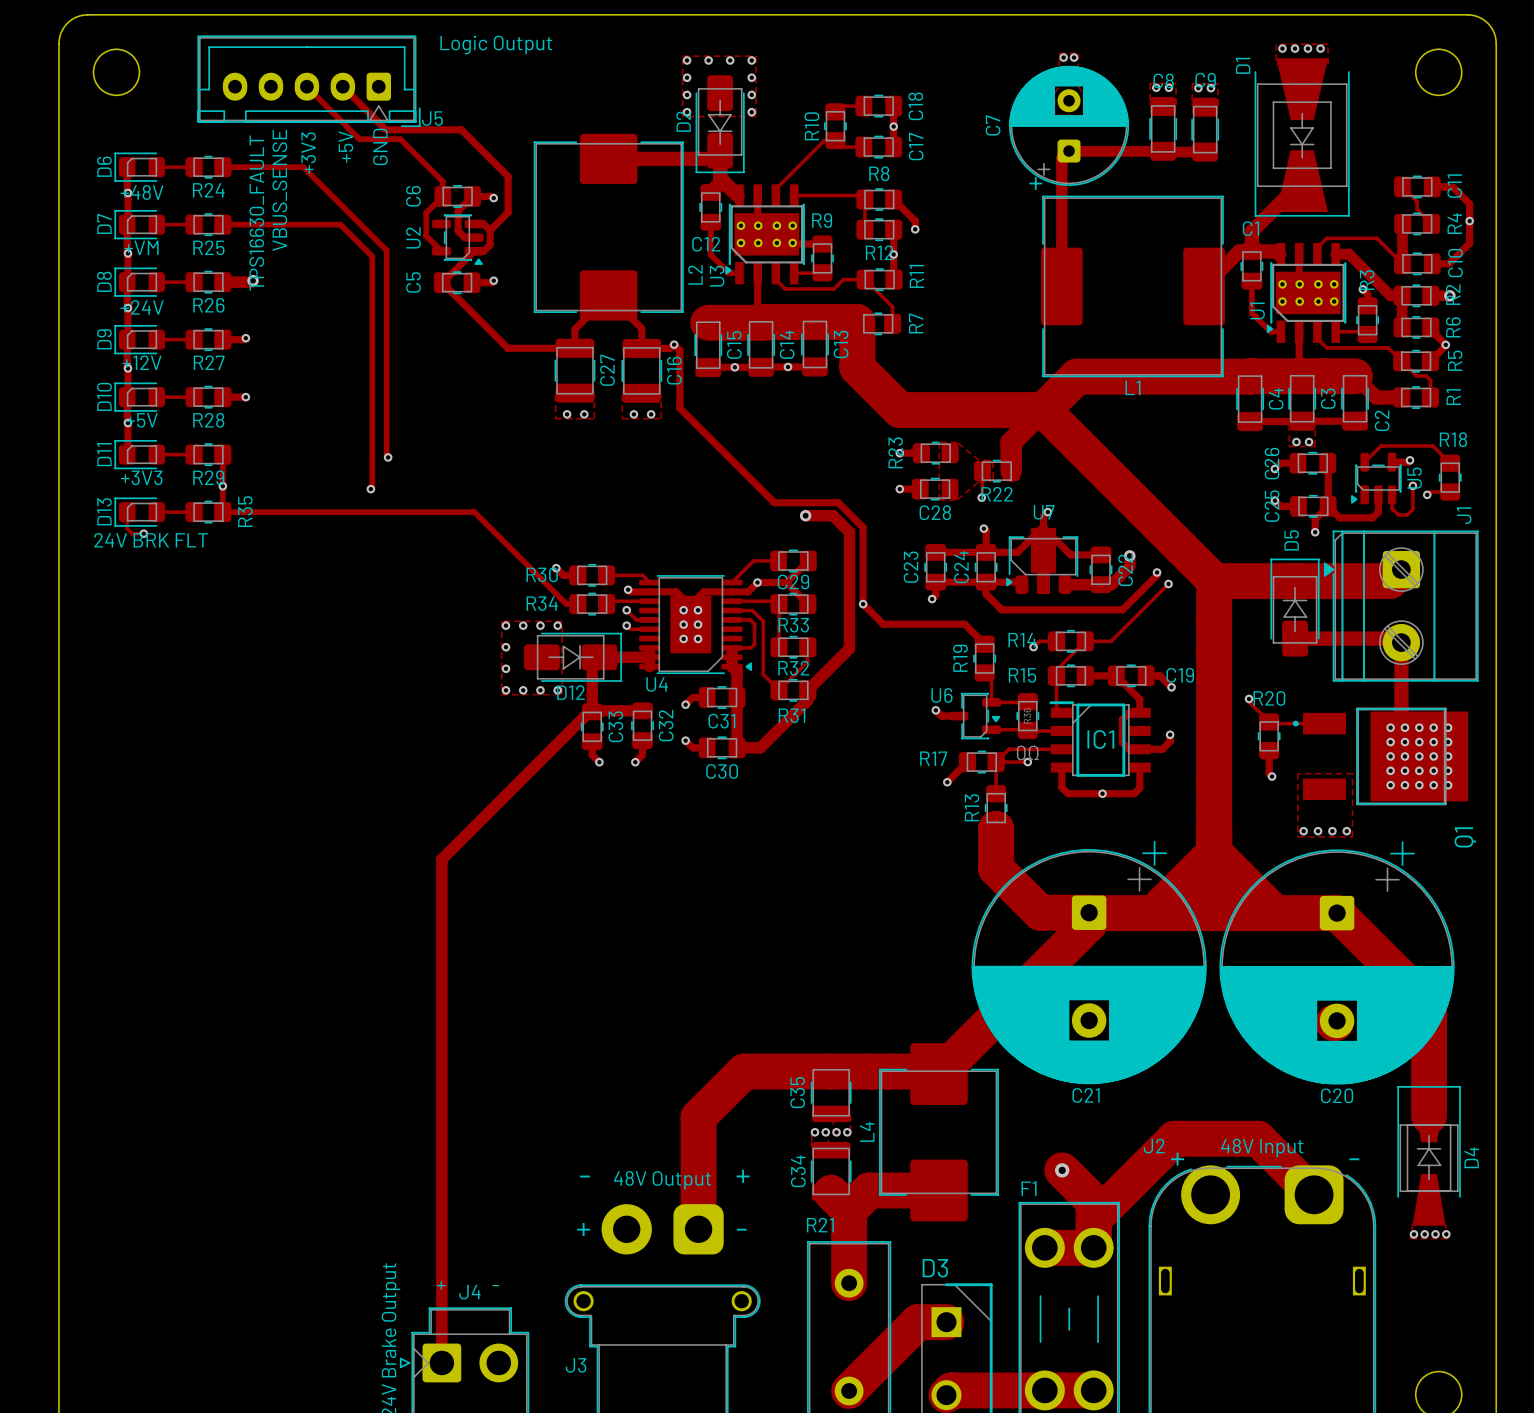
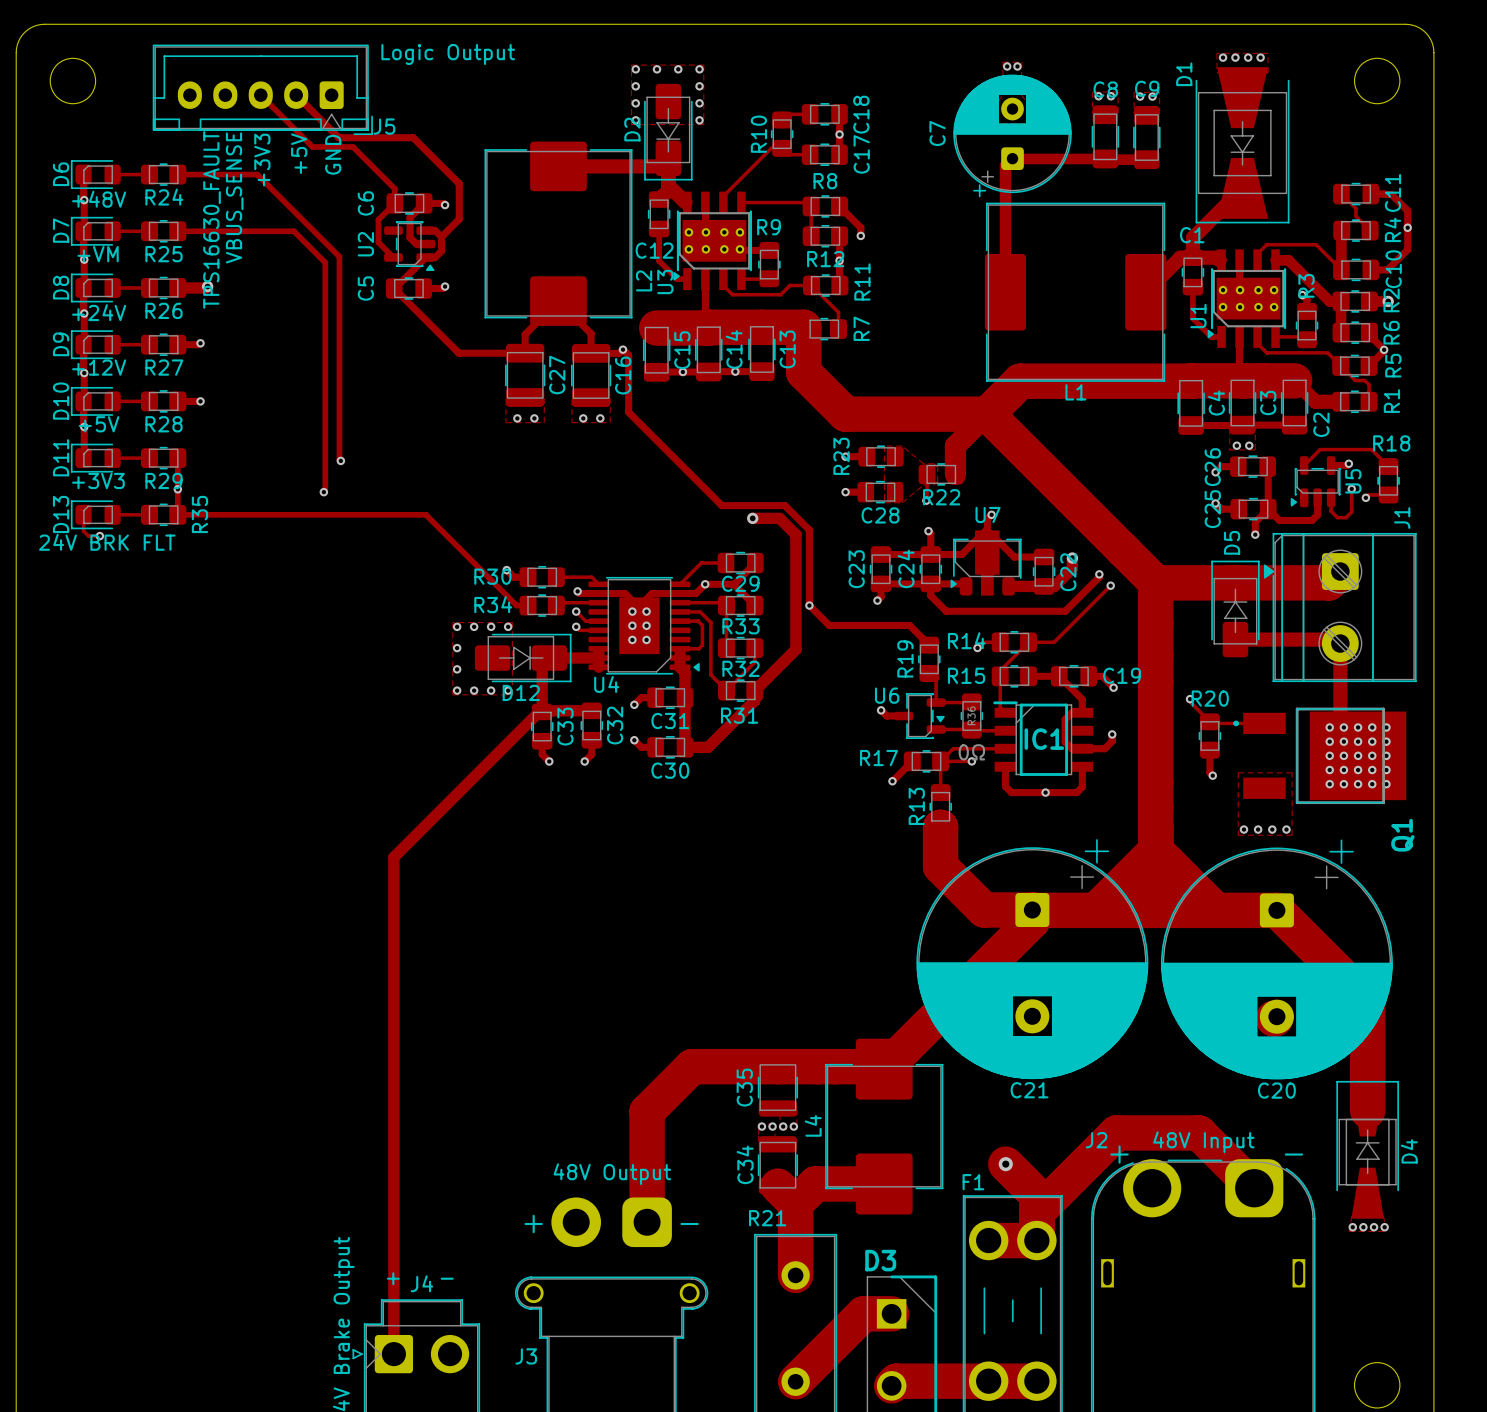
text: - (585, 1176) -> none
text: + (743, 1176) -> none

